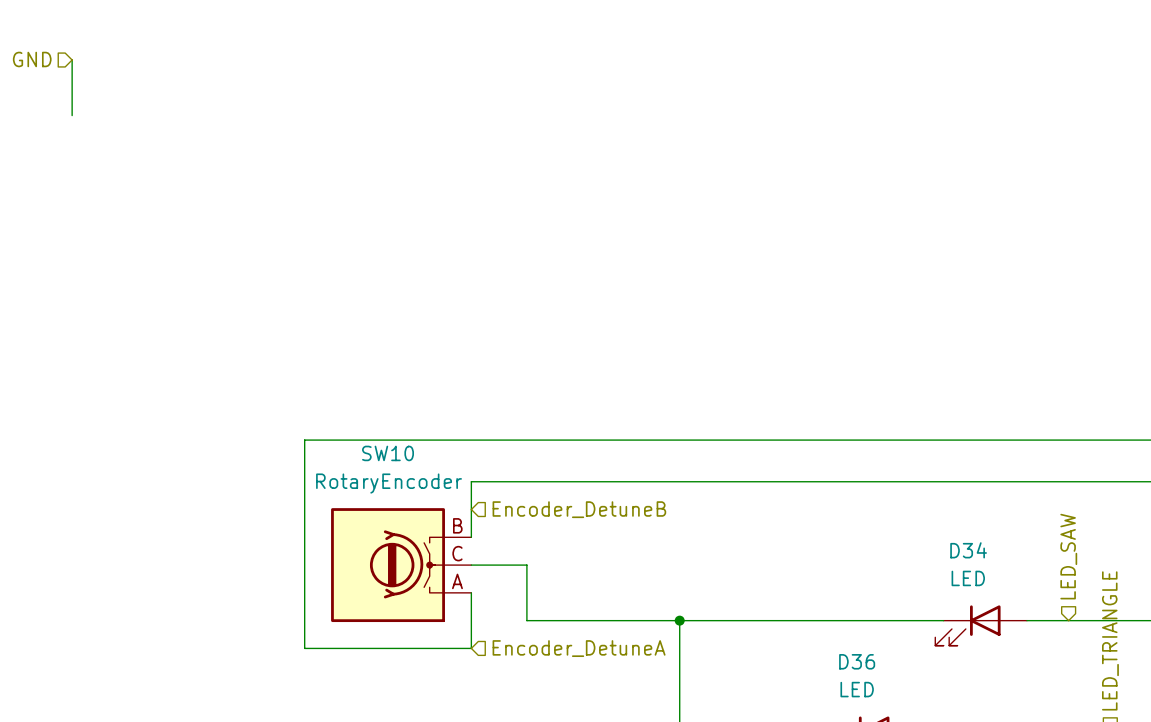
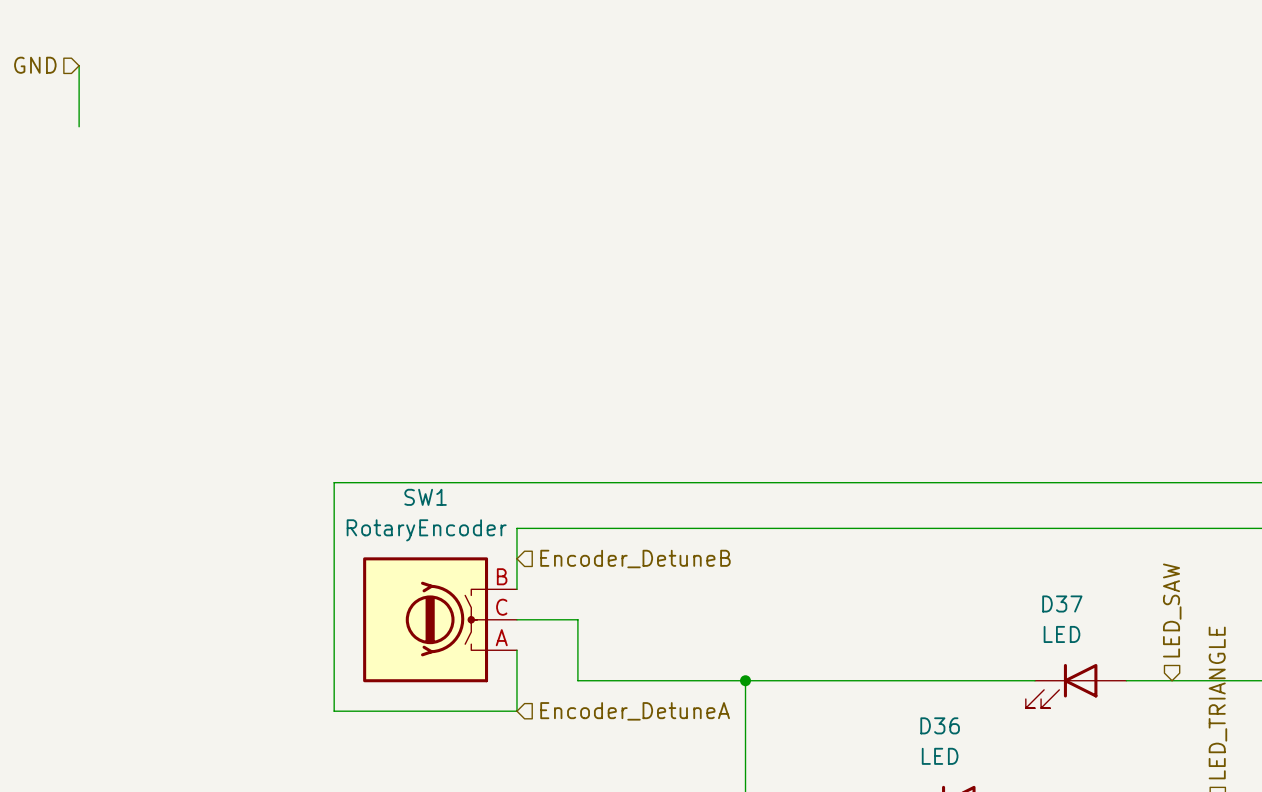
SW10 name: SW10 (388, 453) -> SW1 (425, 497)
D34 name: D34 (968, 550) -> D37 (1062, 603)

